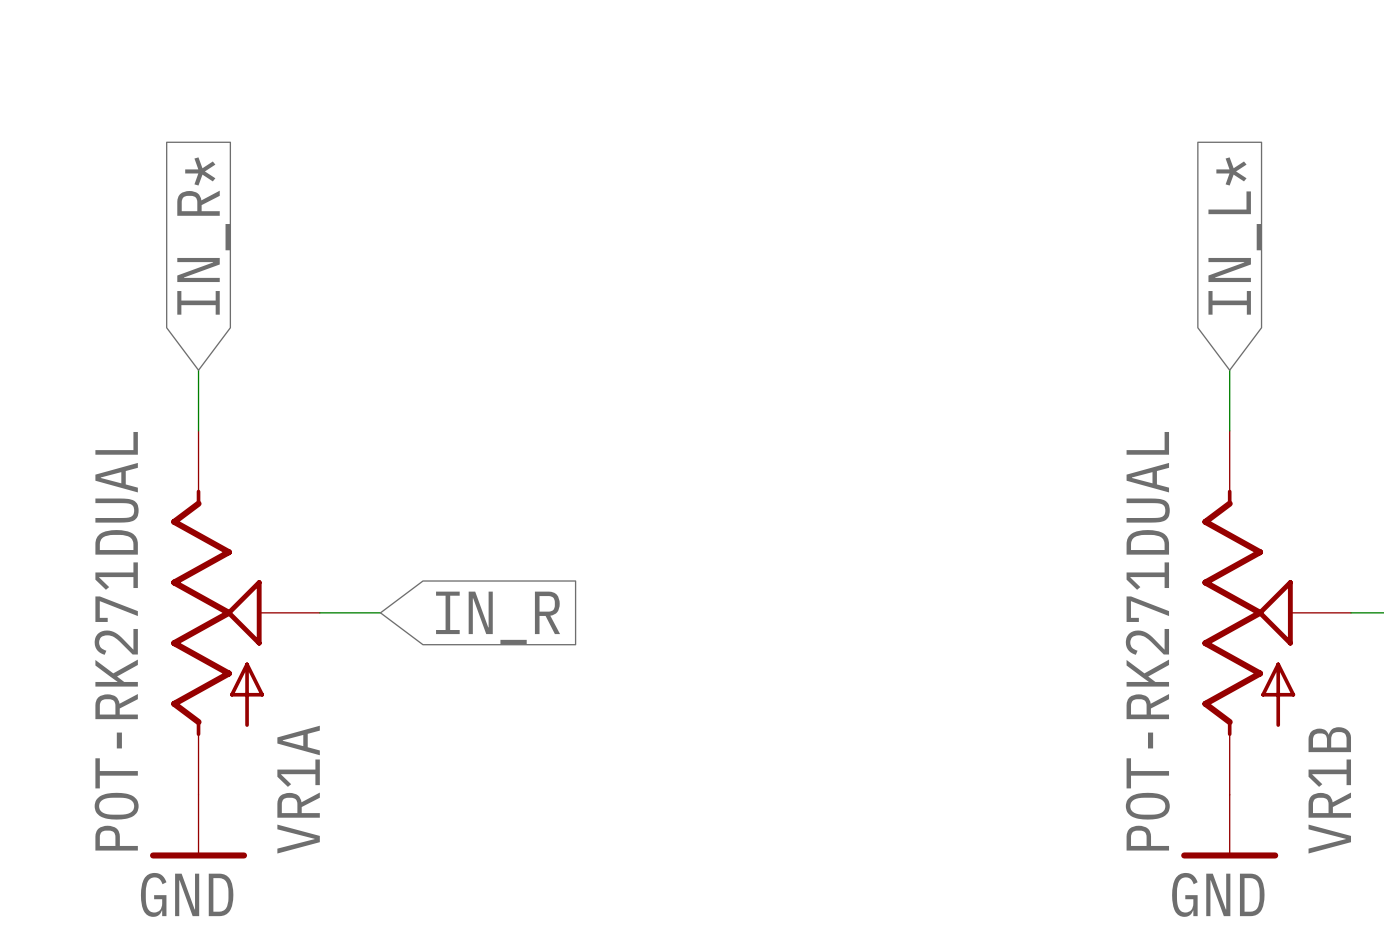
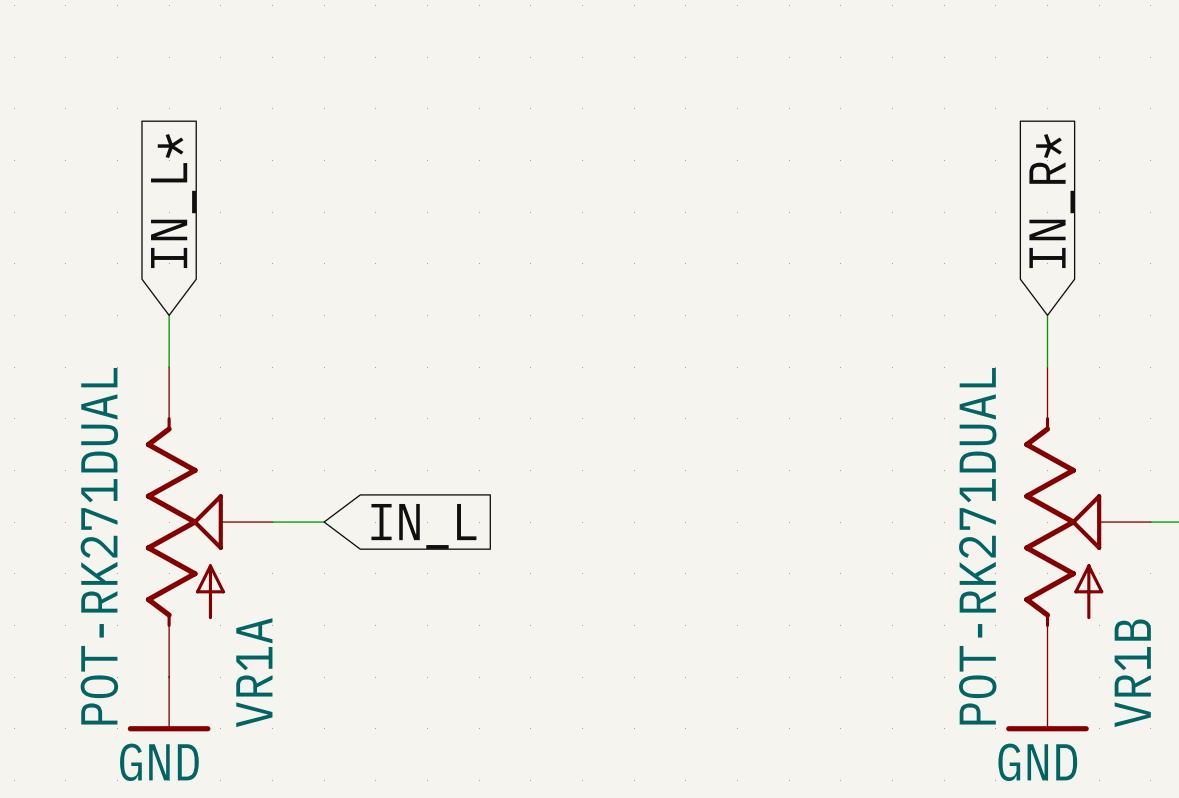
global label: IN_R* (203, 236) -> IN_L* (173, 201)
global label: IN_L* (1234, 236) -> IN_R* (1051, 201)
global label: IN_R (498, 617) -> IN_L (423, 526)

